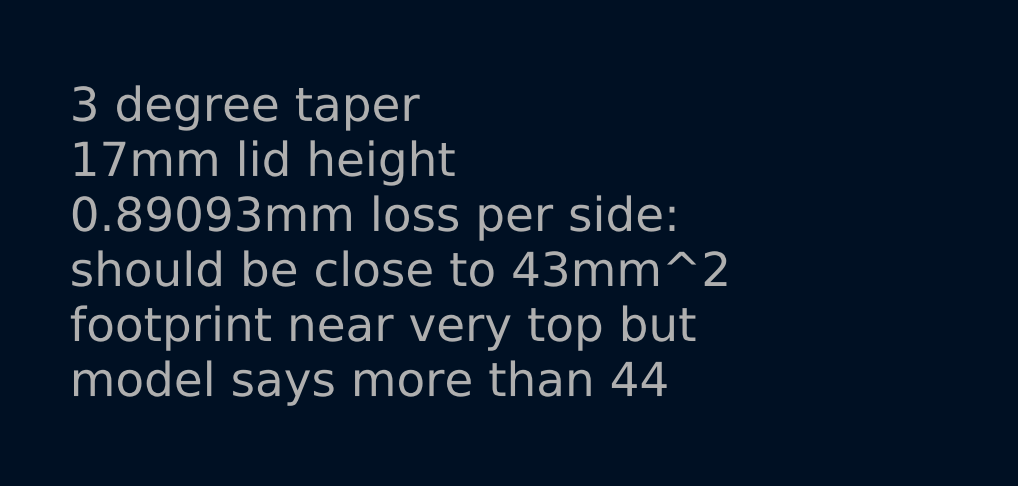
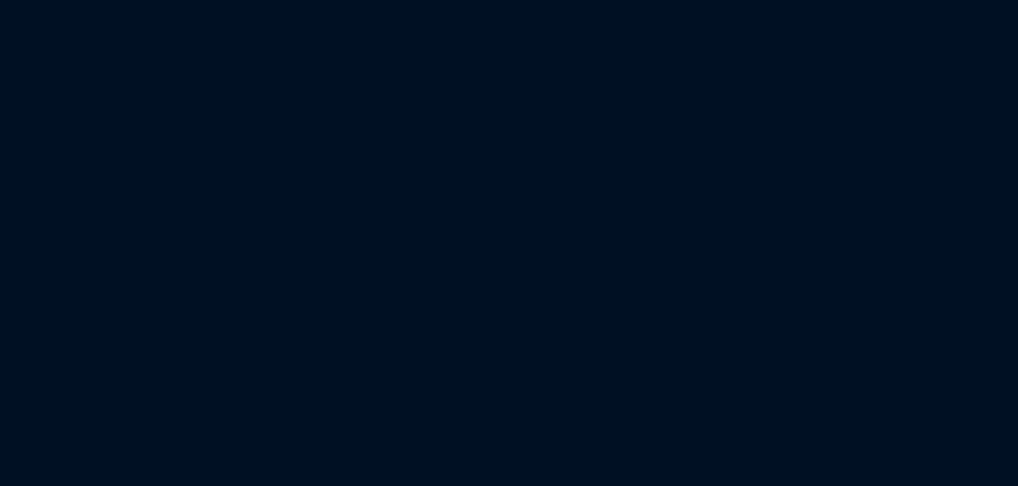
text: 3 degree taper (246, 107) -> none
text: 17mm lid height (264, 163) -> none
text: 0.89093mm loss per side: (373, 218) -> none
text: should be close to 43mm^2 (399, 268) -> none
text: footprint near very top but (383, 328) -> none
text: model says more than 44 (370, 383) -> none

